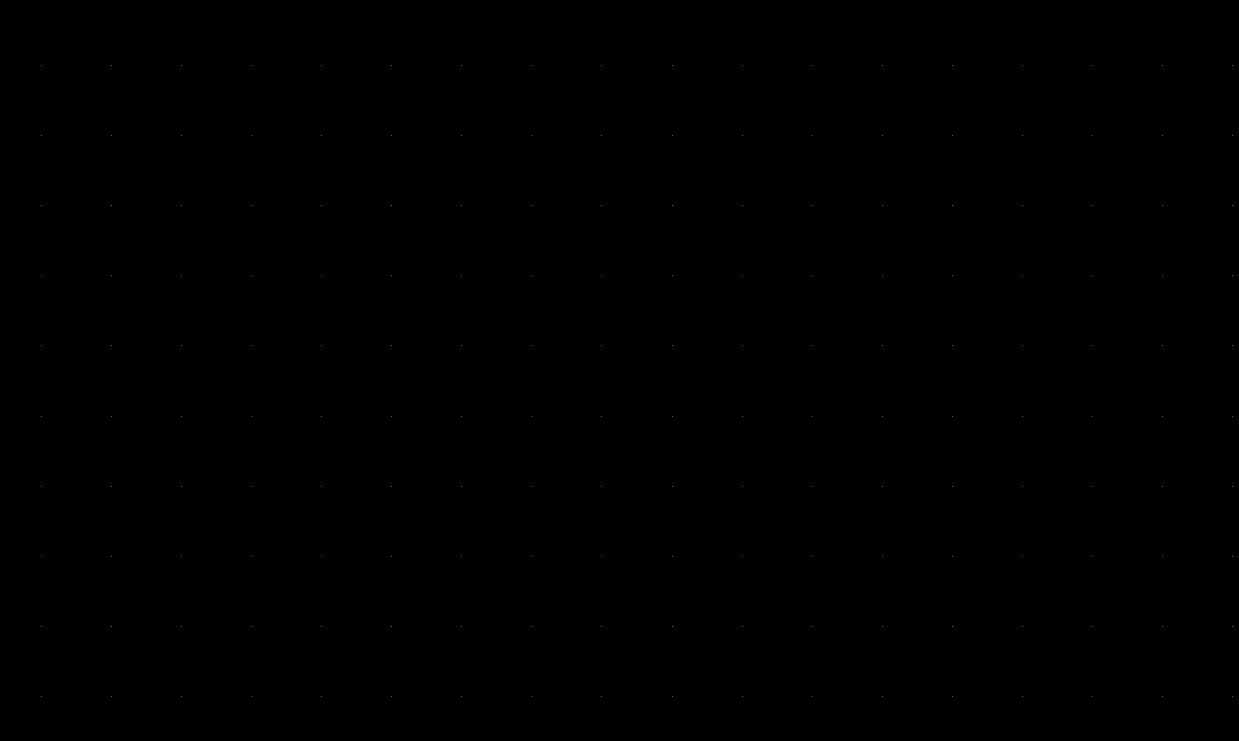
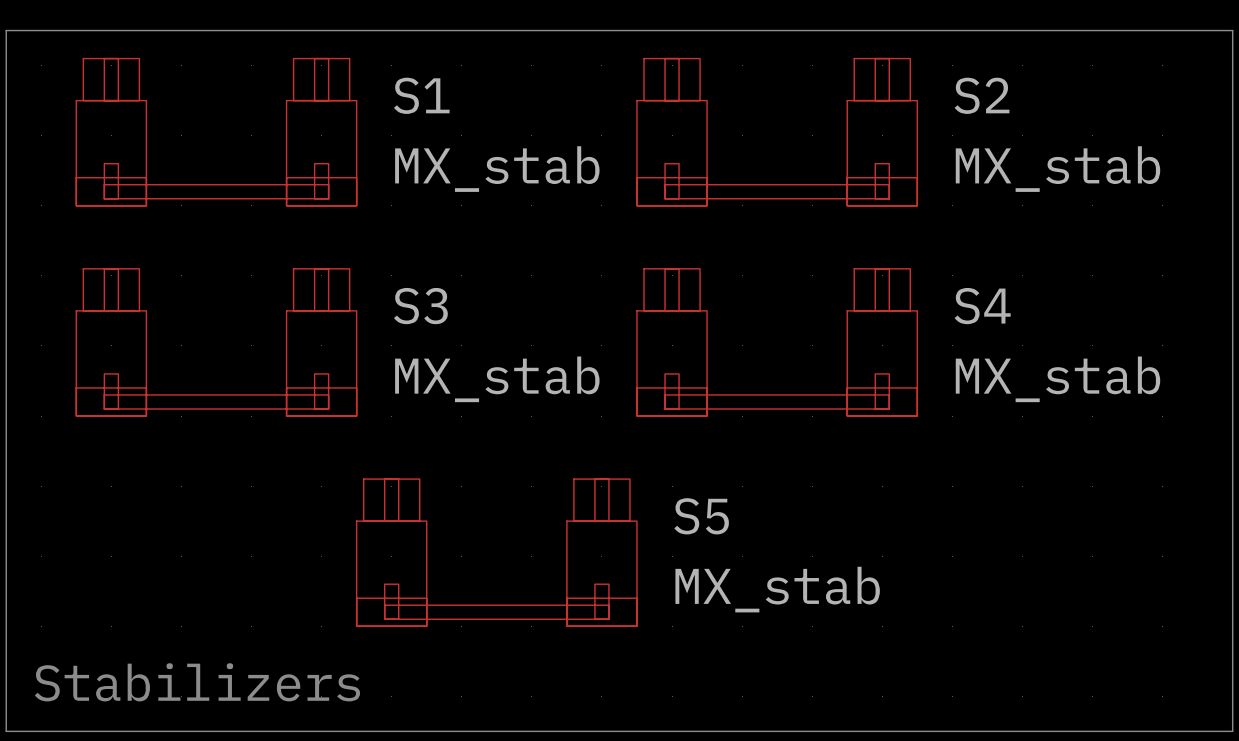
line: none -> (6, 30) (1232, 30) (1232, 731) (6, 731) (6, 30)
S1: none -> MX_stab (216, 132)
S2: none -> MX_stab (777, 132)
S3: none -> MX_stab (216, 342)
S4: none -> MX_stab (777, 342)
S5: none -> MX_stab (496, 552)
text: none -> Stabilizers (197, 682)

